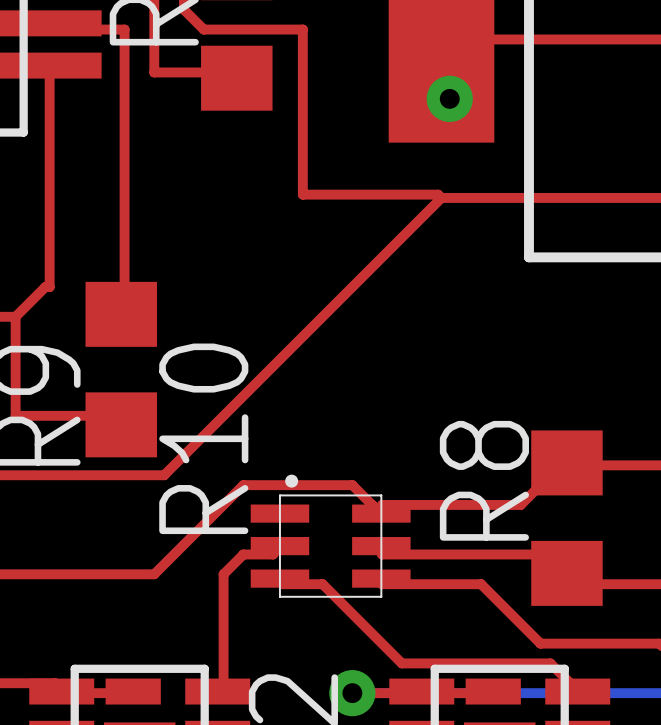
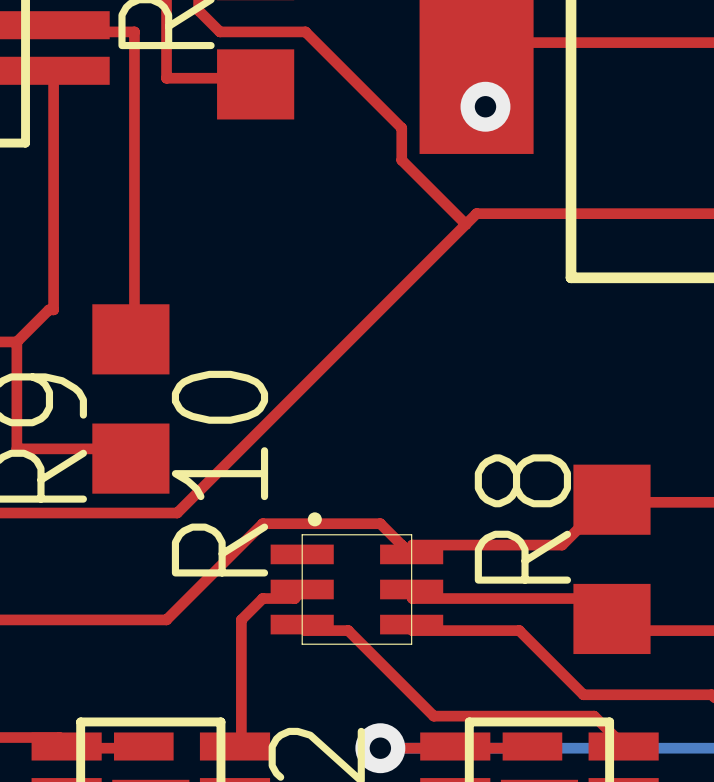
top track: (283, 29) (302, 29) (302, 194) (438, 194) (441, 197) -> (305, 31) (401, 128) (401, 160) (465, 224)

